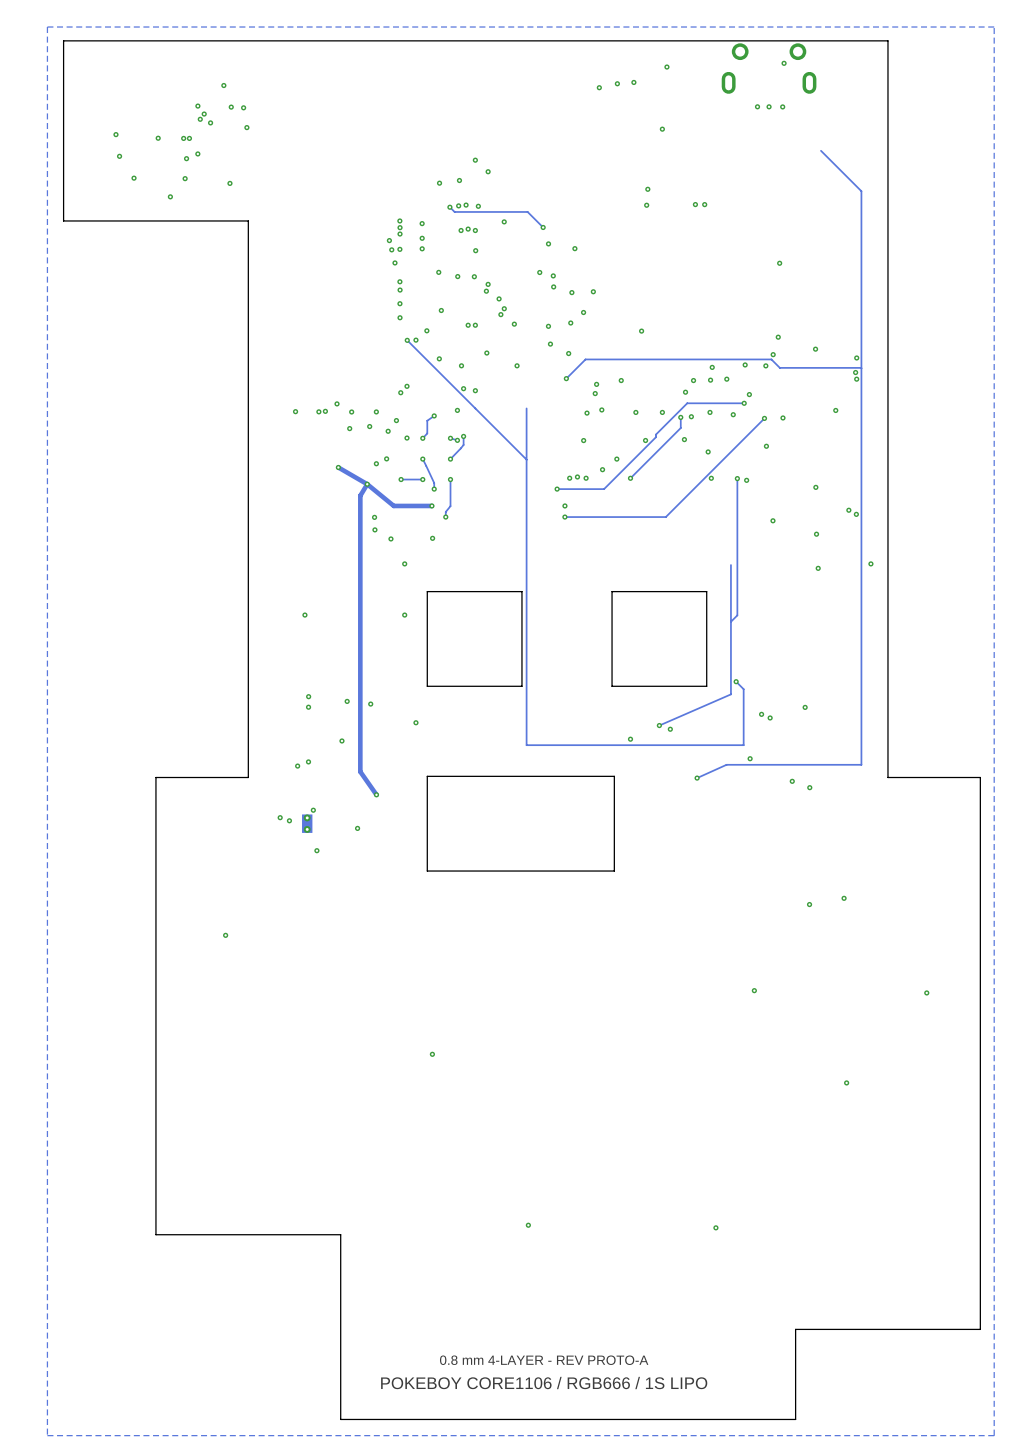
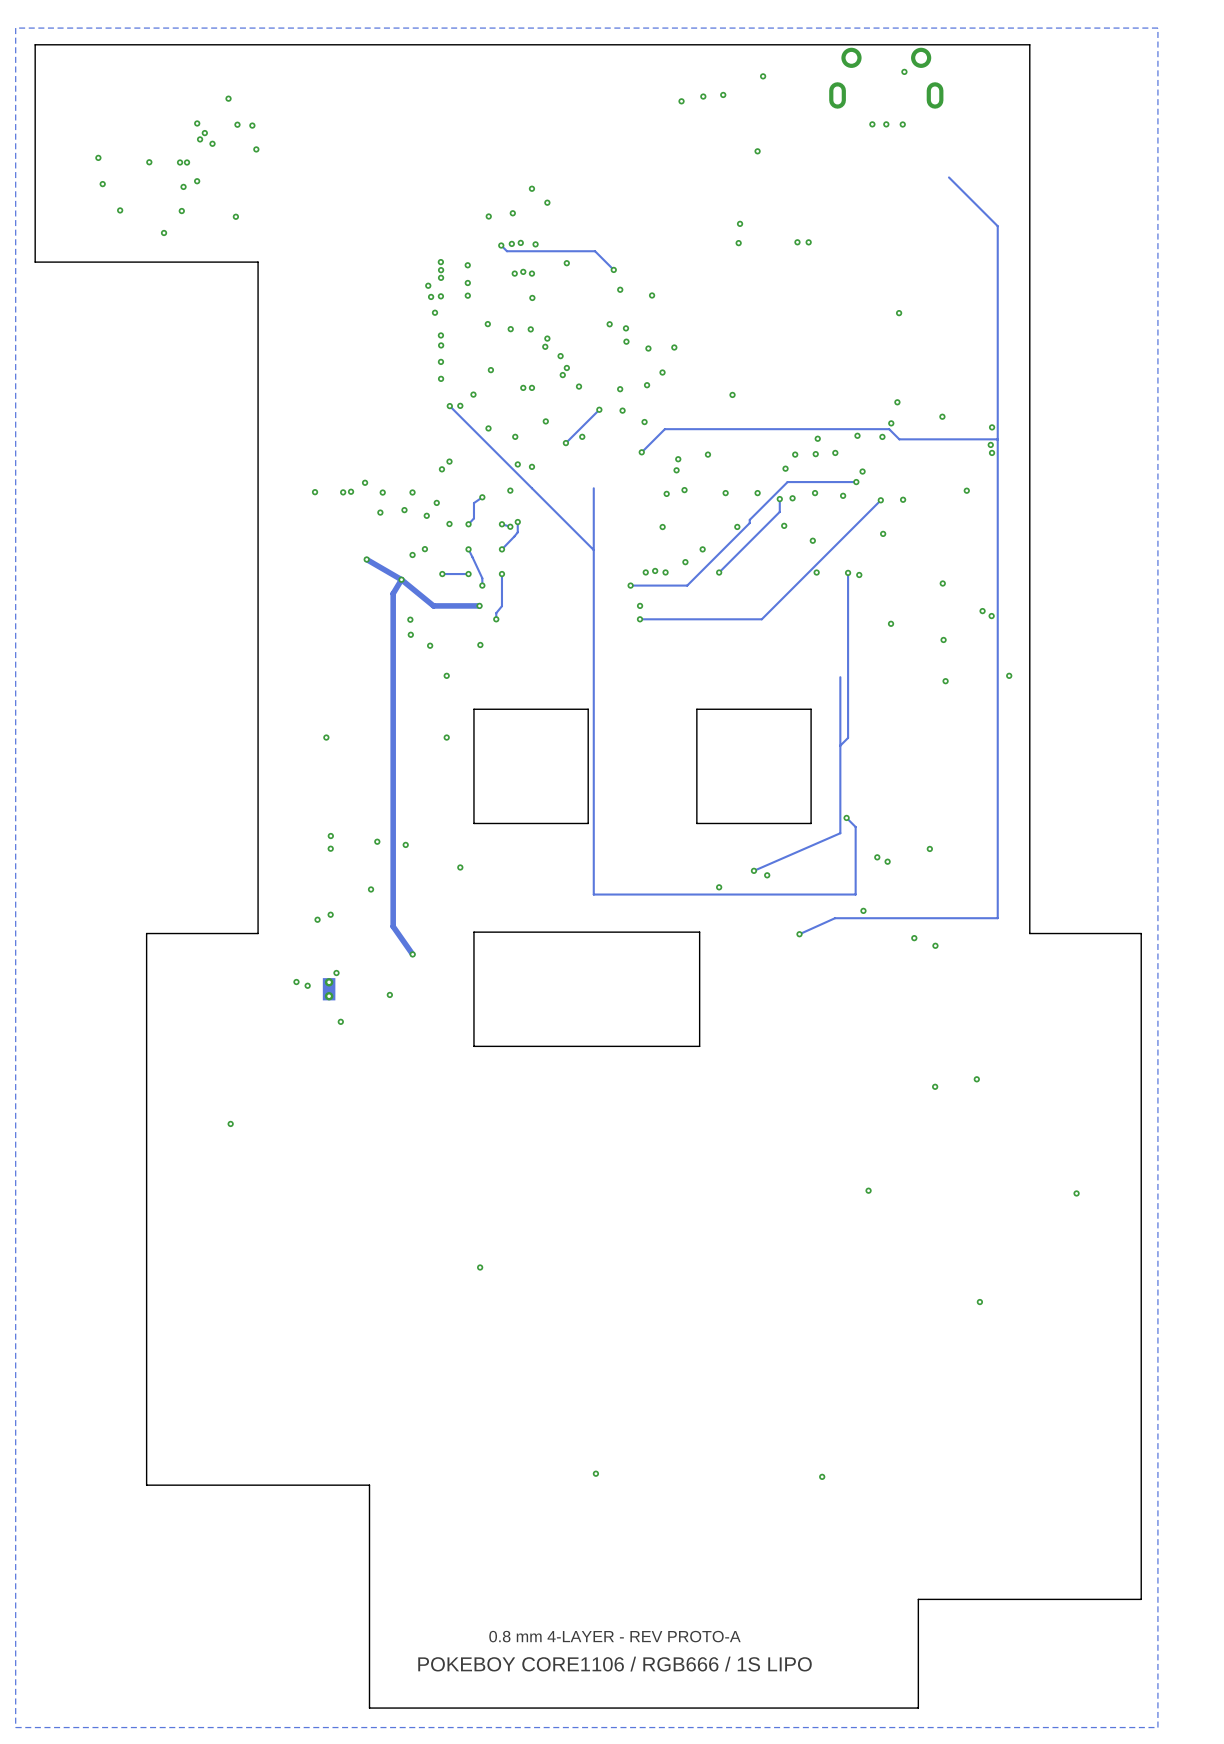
track: none -> (599, 409) (565, 443)
via: none -> (599, 409)
via: none -> (565, 443)

